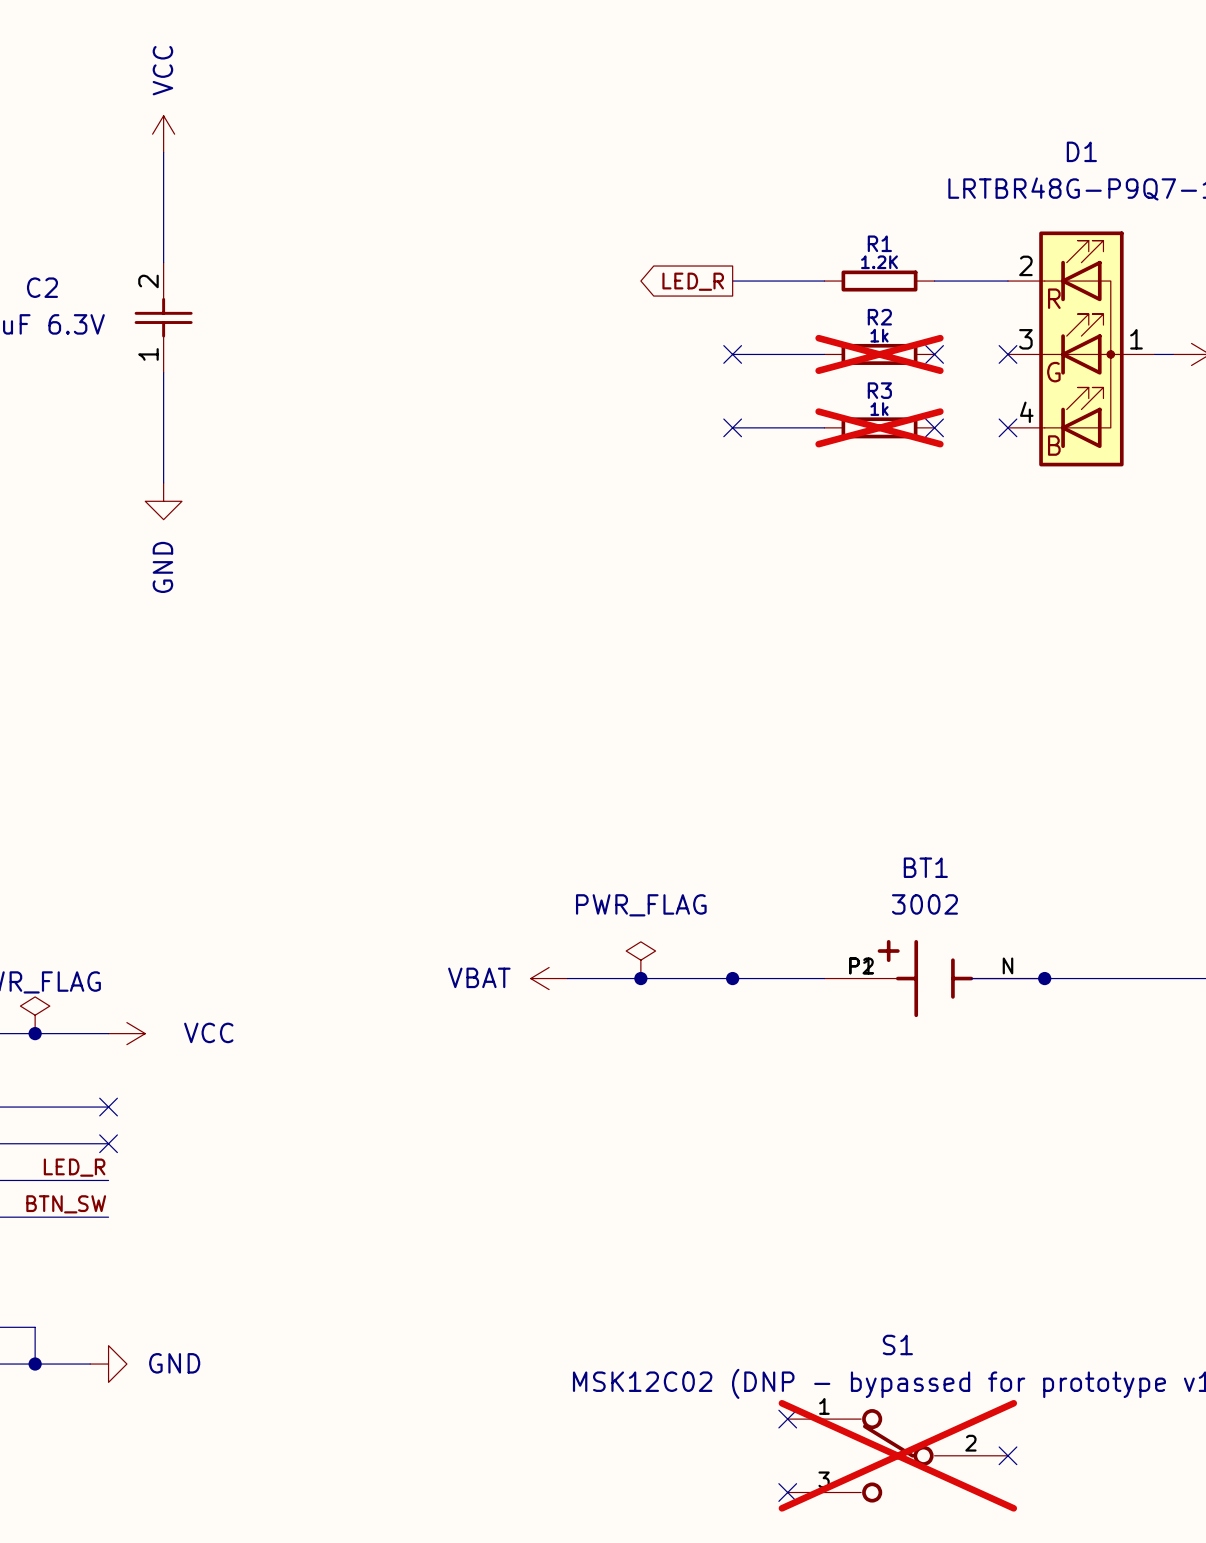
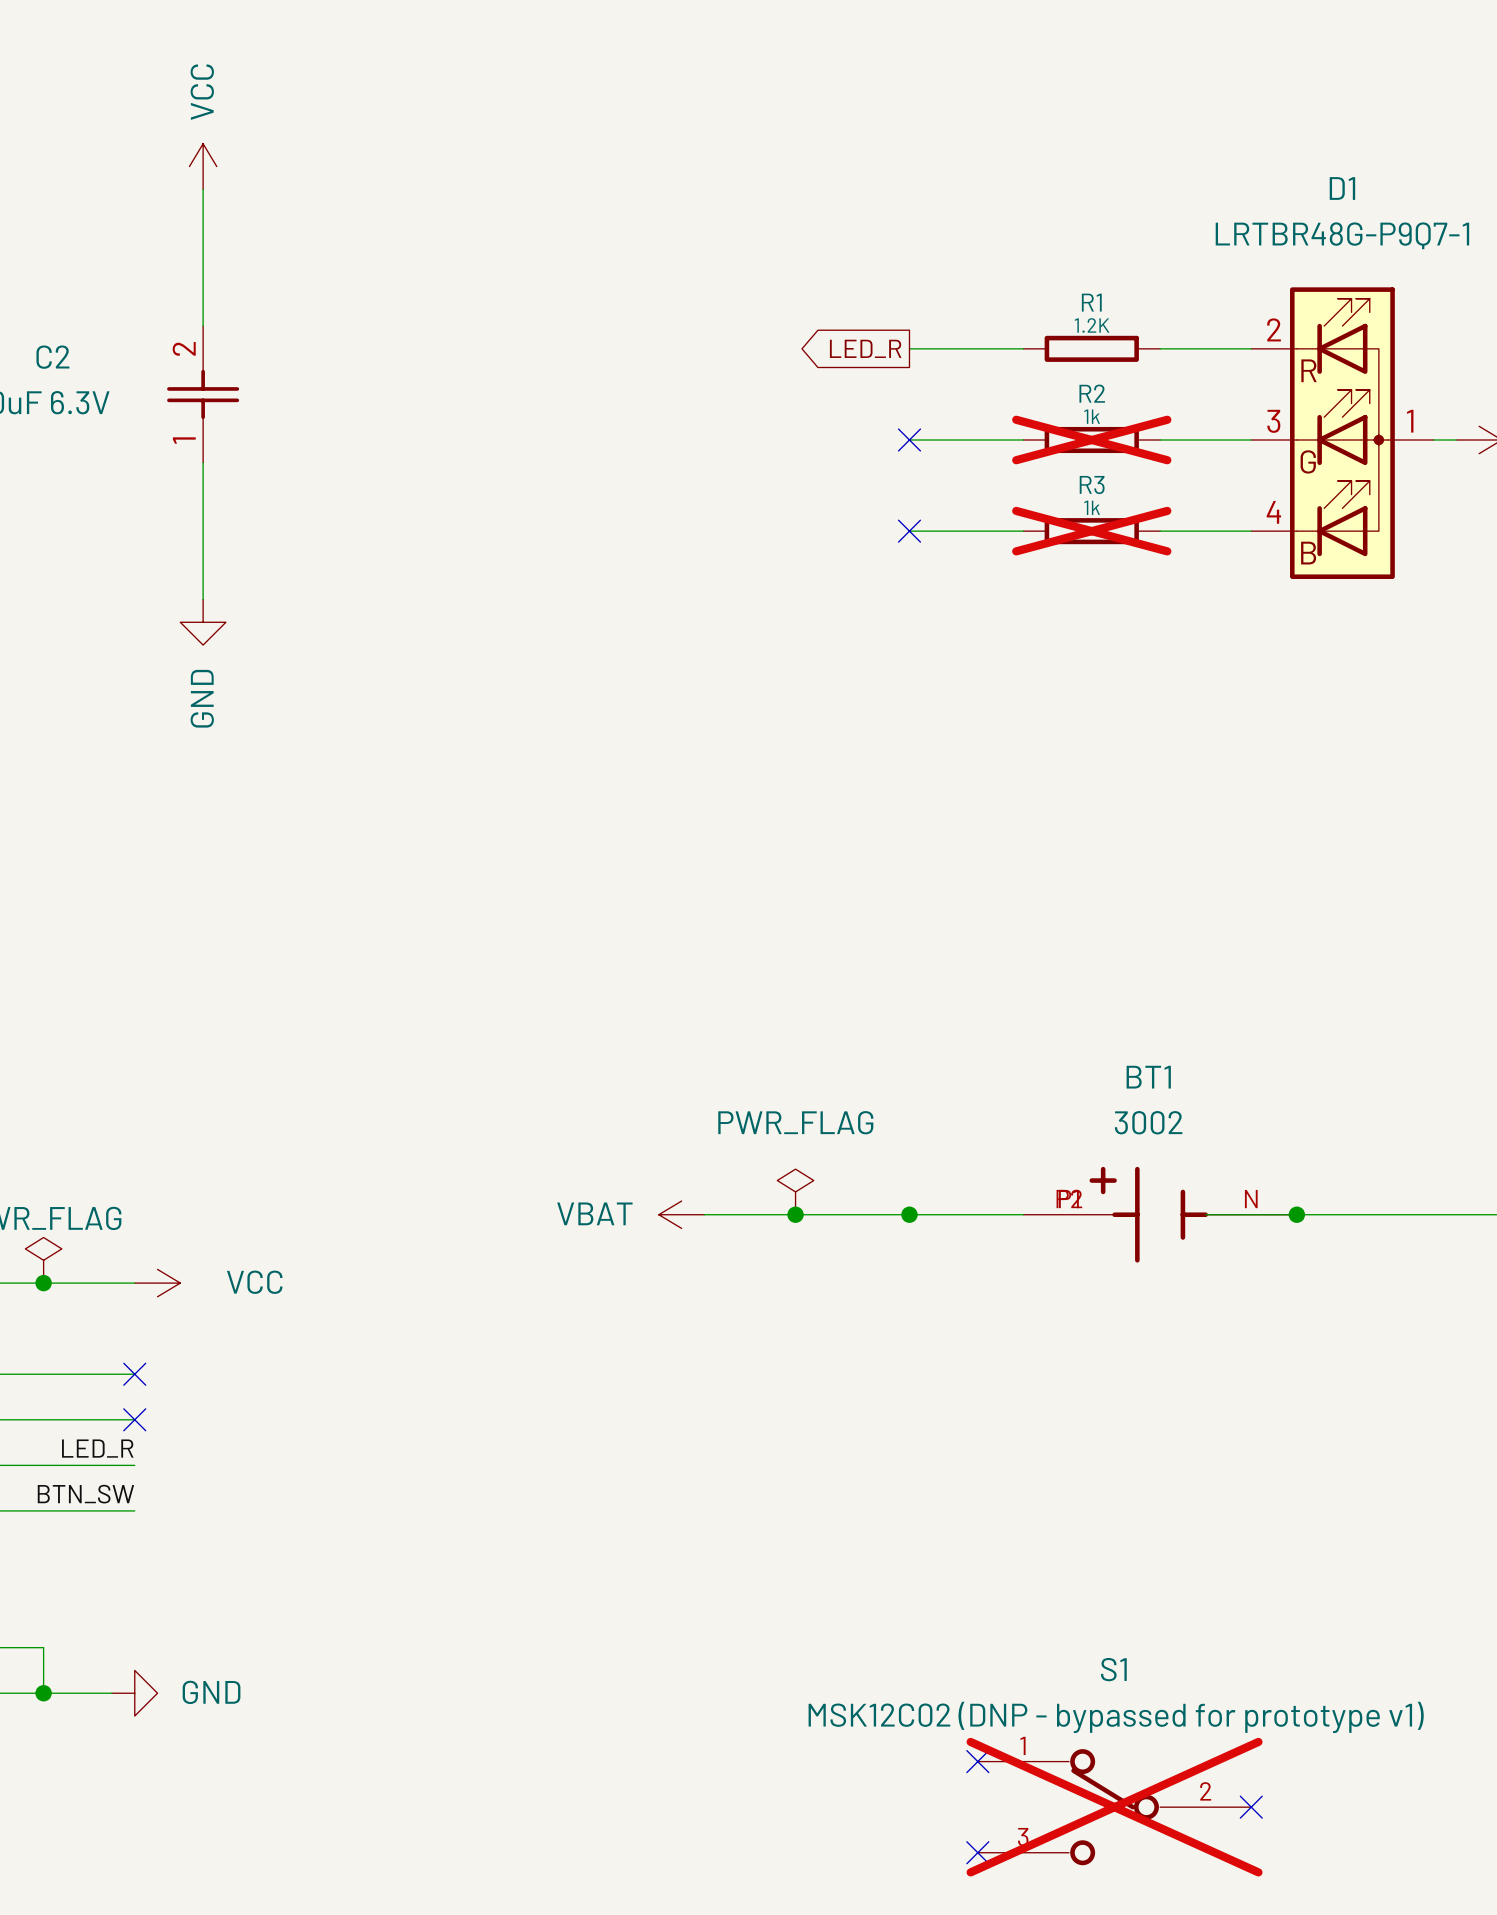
wire: none -> (1160, 440) (1251, 440)
no-connect mark: (934, 354) -> none
no-connect mark: (1007, 354) -> none
wire: none -> (1160, 531) (1251, 531)
no-connect mark: (934, 427) -> none
no-connect mark: (1007, 427) -> none

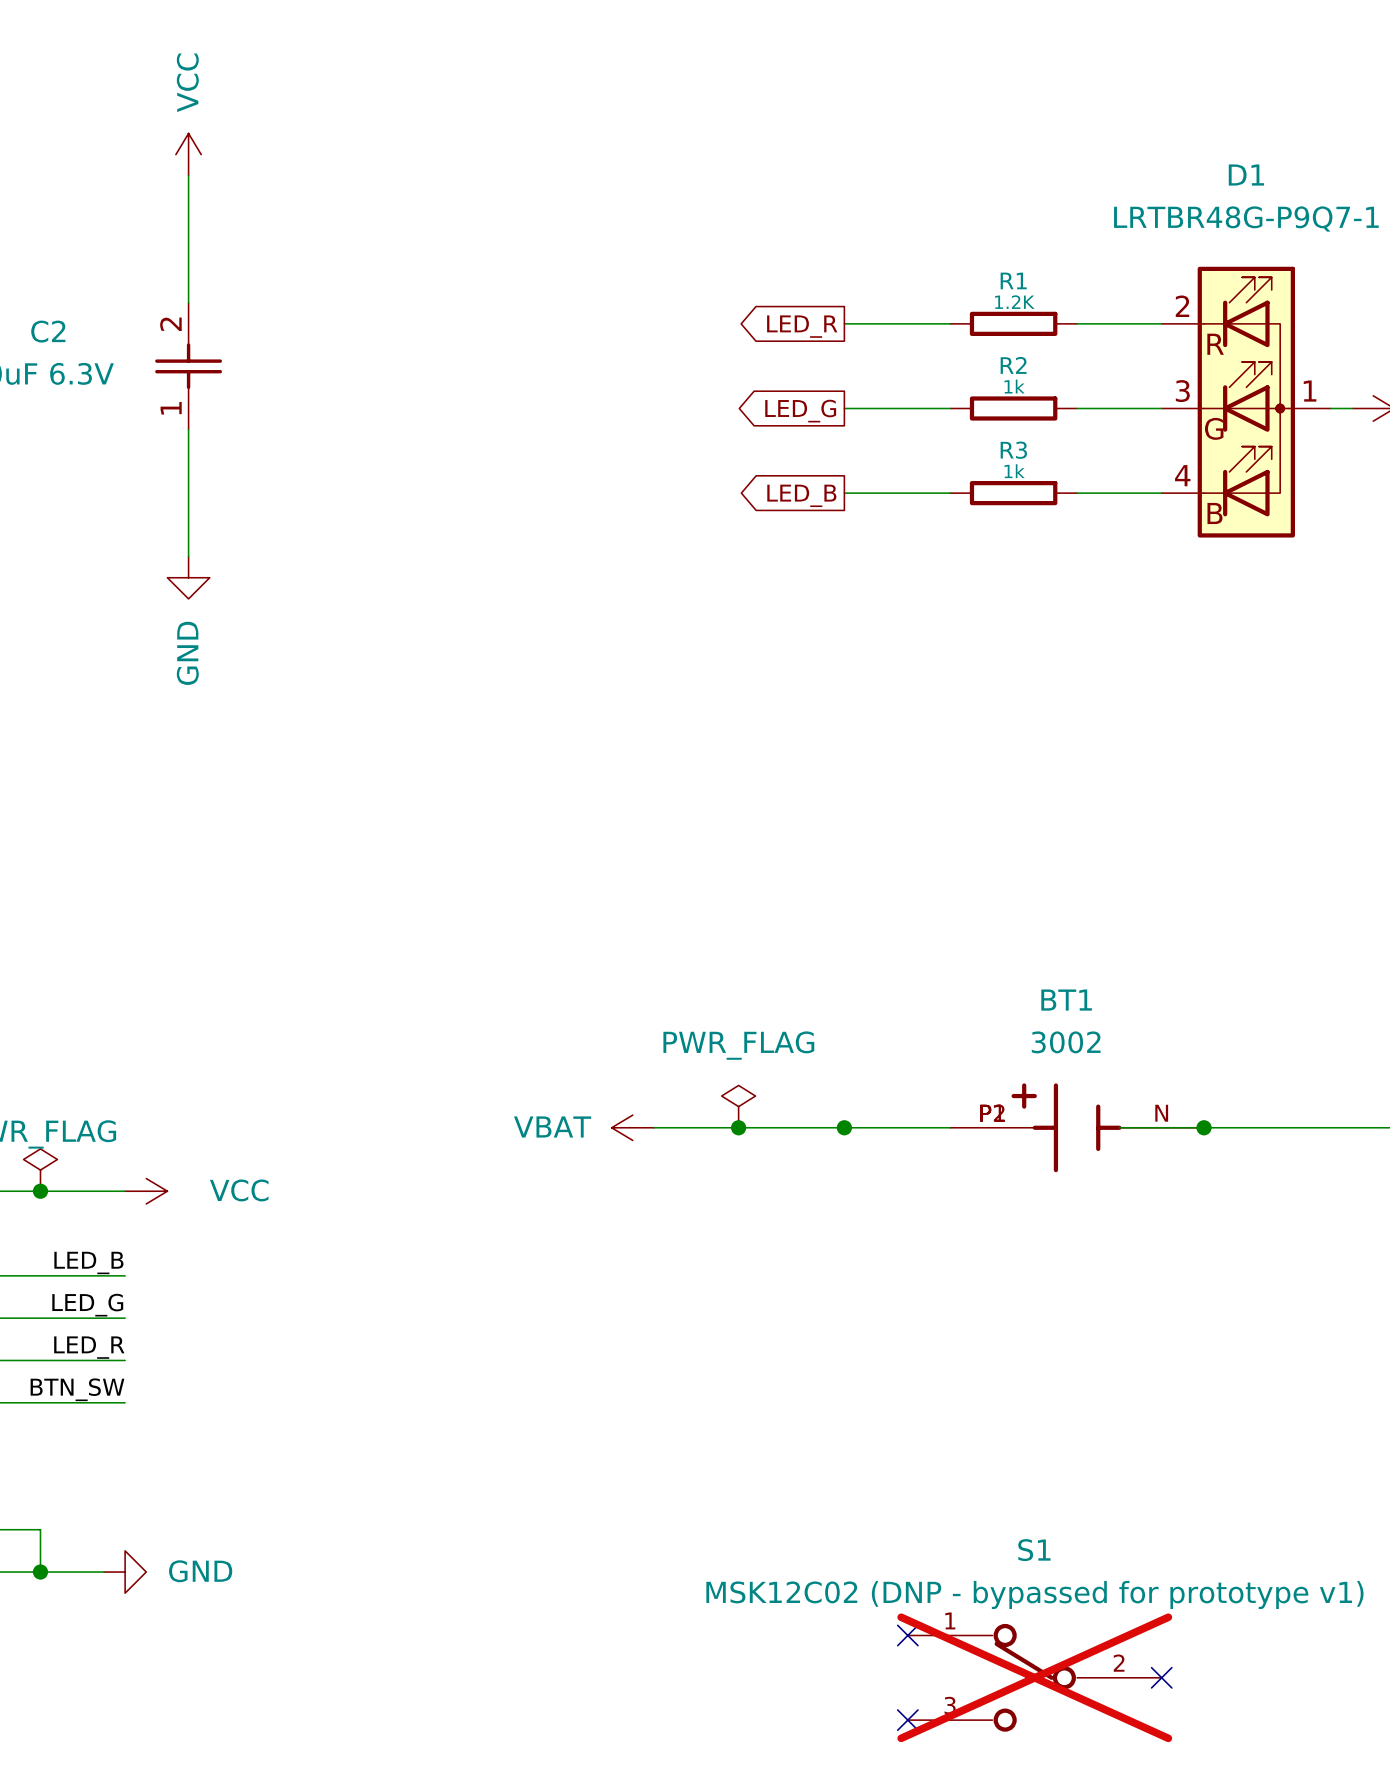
global label: none -> LED_G (800, 411)
no-connect mark: (909, 440) -> none
R2 do-not-place cross: (1091, 440) -> none
global label: none -> LED_B (801, 495)
no-connect mark: (909, 531) -> none
R3 do-not-place cross: (1091, 531) -> none
label: none -> LED_B (88, 1262)
no-connect mark: (134, 1374) -> none
label: none -> LED_G (87, 1305)
no-connect mark: (134, 1419) -> none

